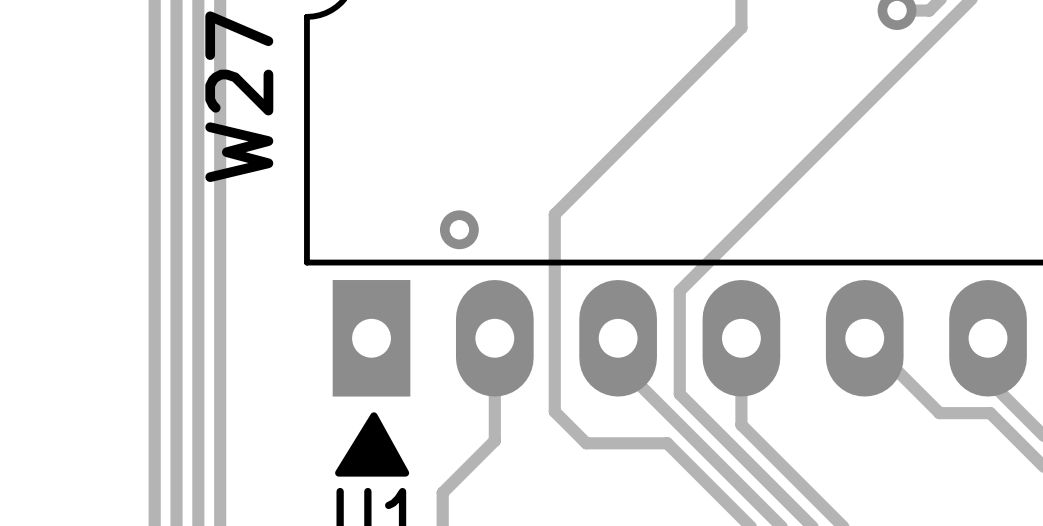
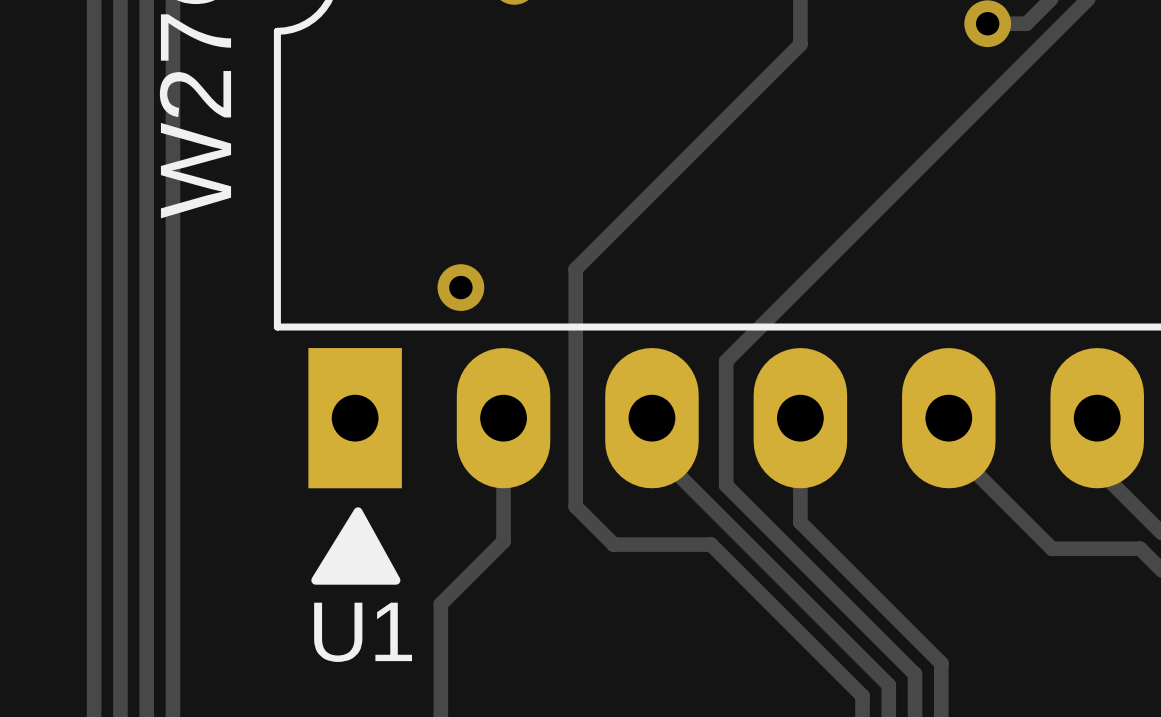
track: (864, 338) (939, 413) (990, 413) (1023, 446) -> (948, 418) (948, 445) (1052, 548) (1140, 548)

